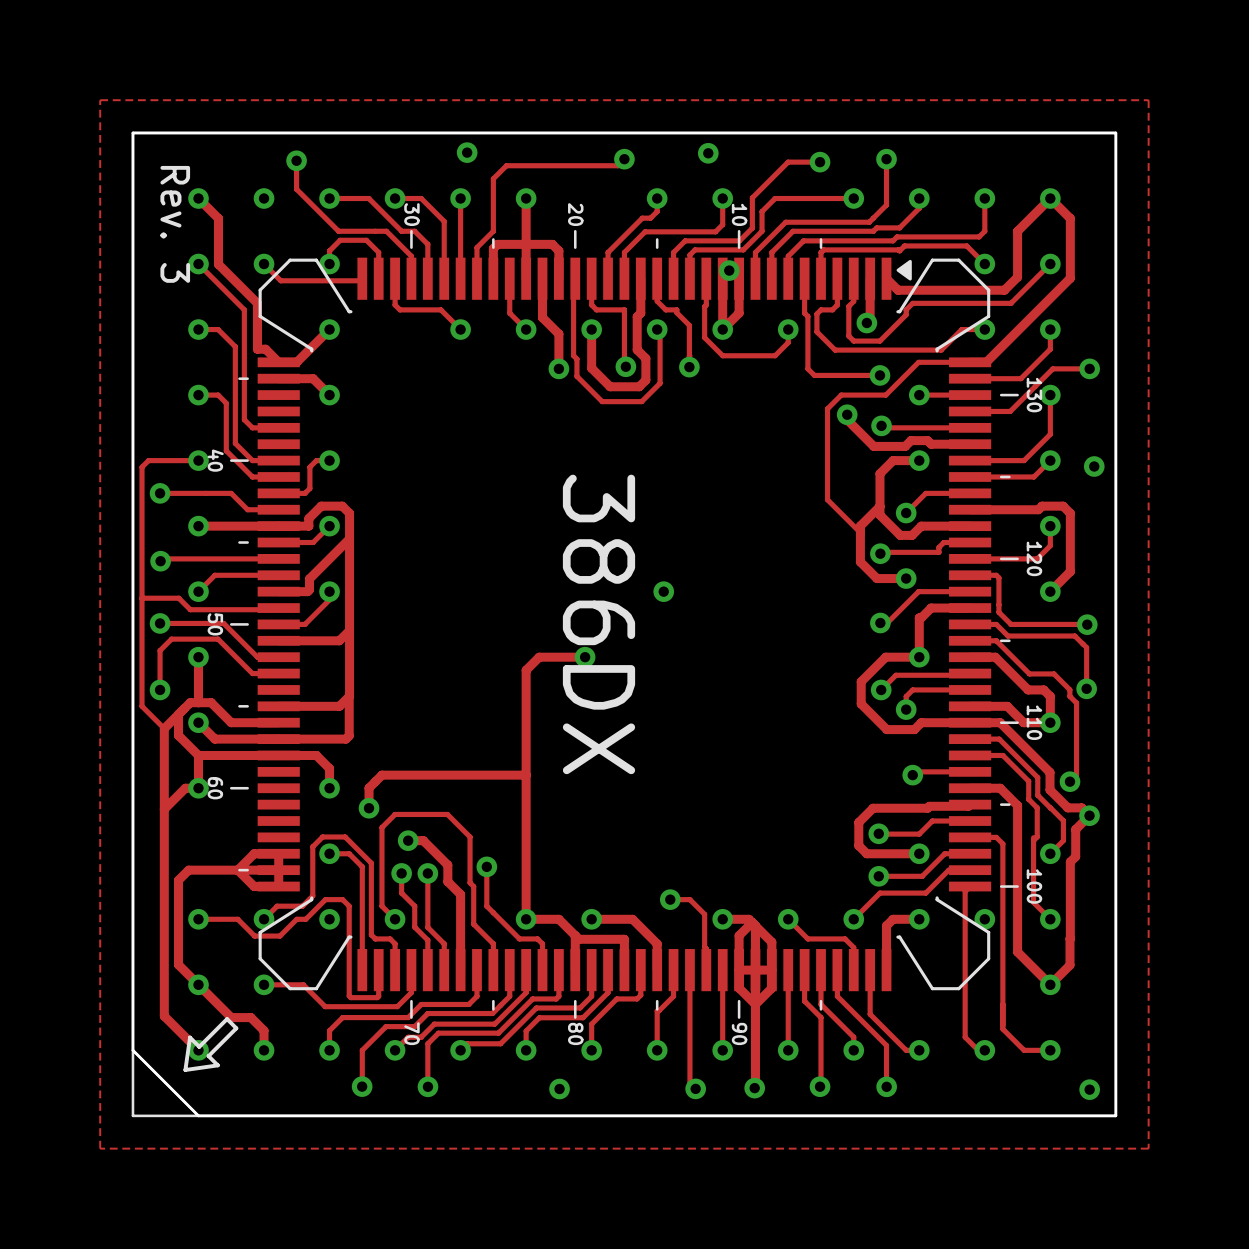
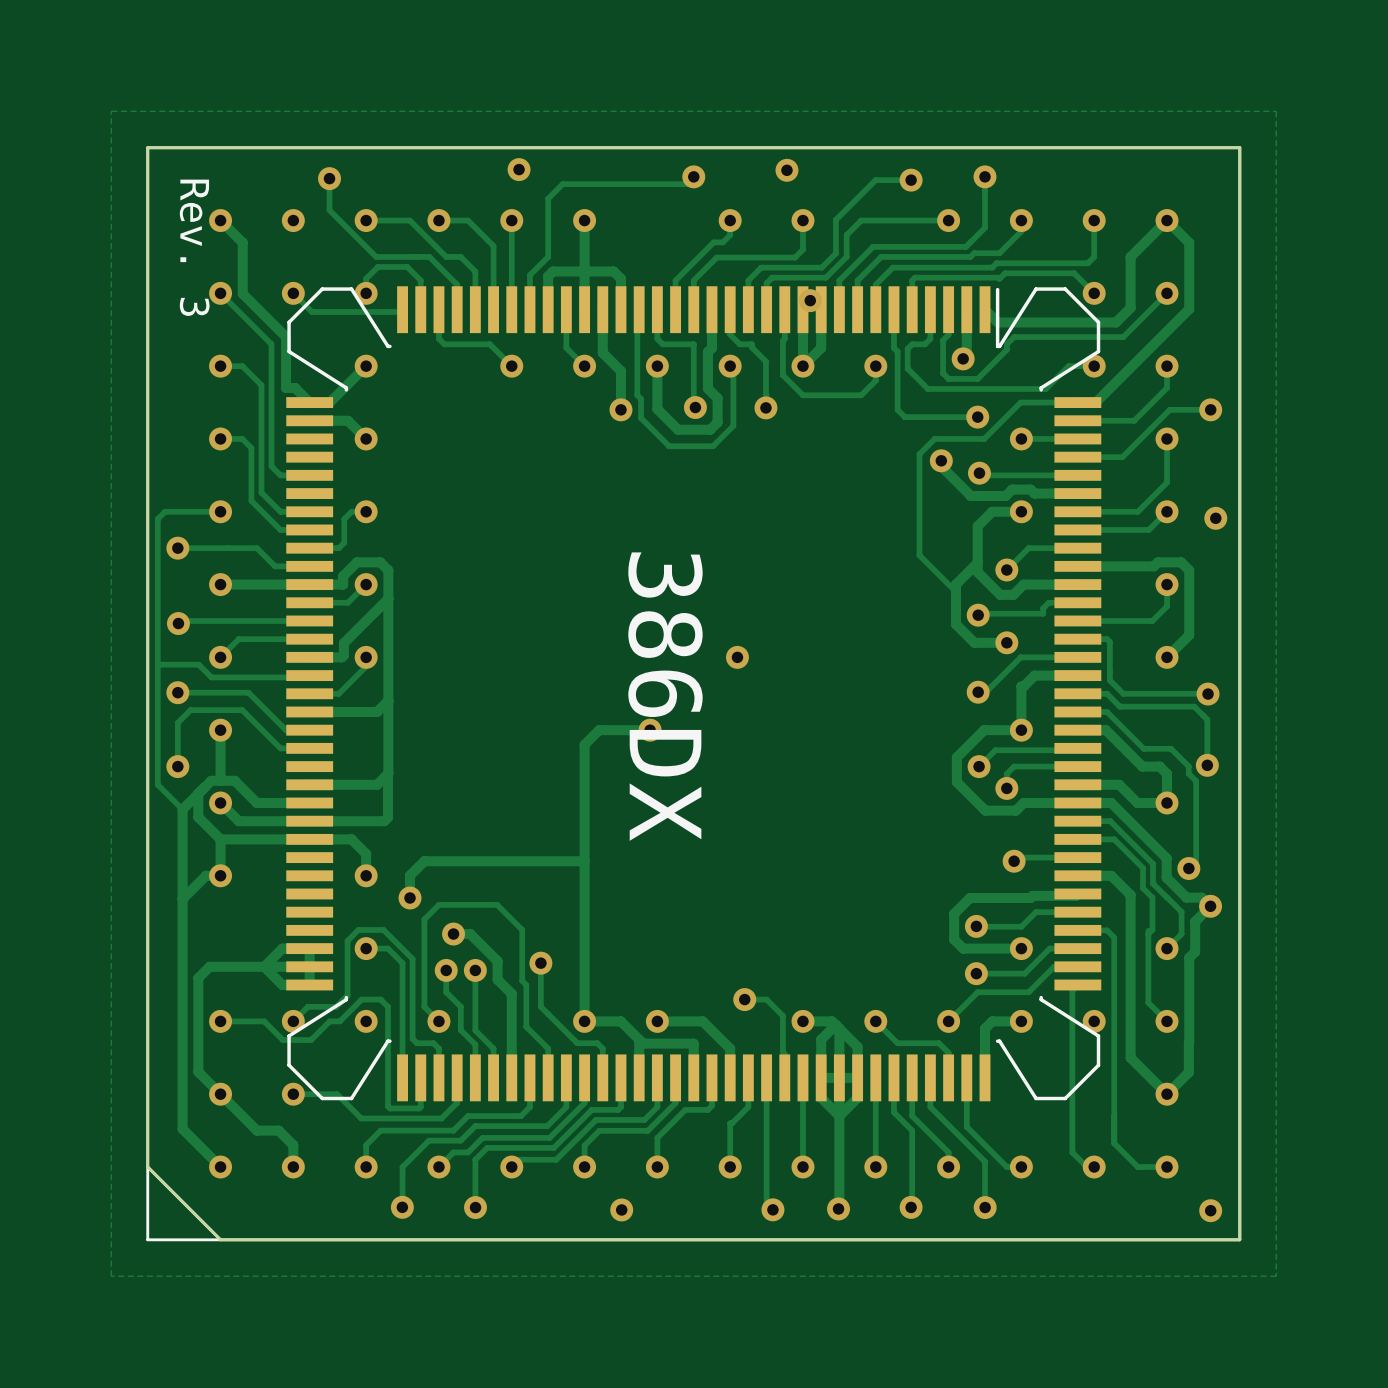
part footprint: [229, 229, 1019, 1019] -> [286, 286, 1102, 1102]
line: (227, 1019) (236, 1028) (208, 1056) (217, 1065) (185, 1070) (190, 1037) (199, 1046) (227, 1019) -> none

